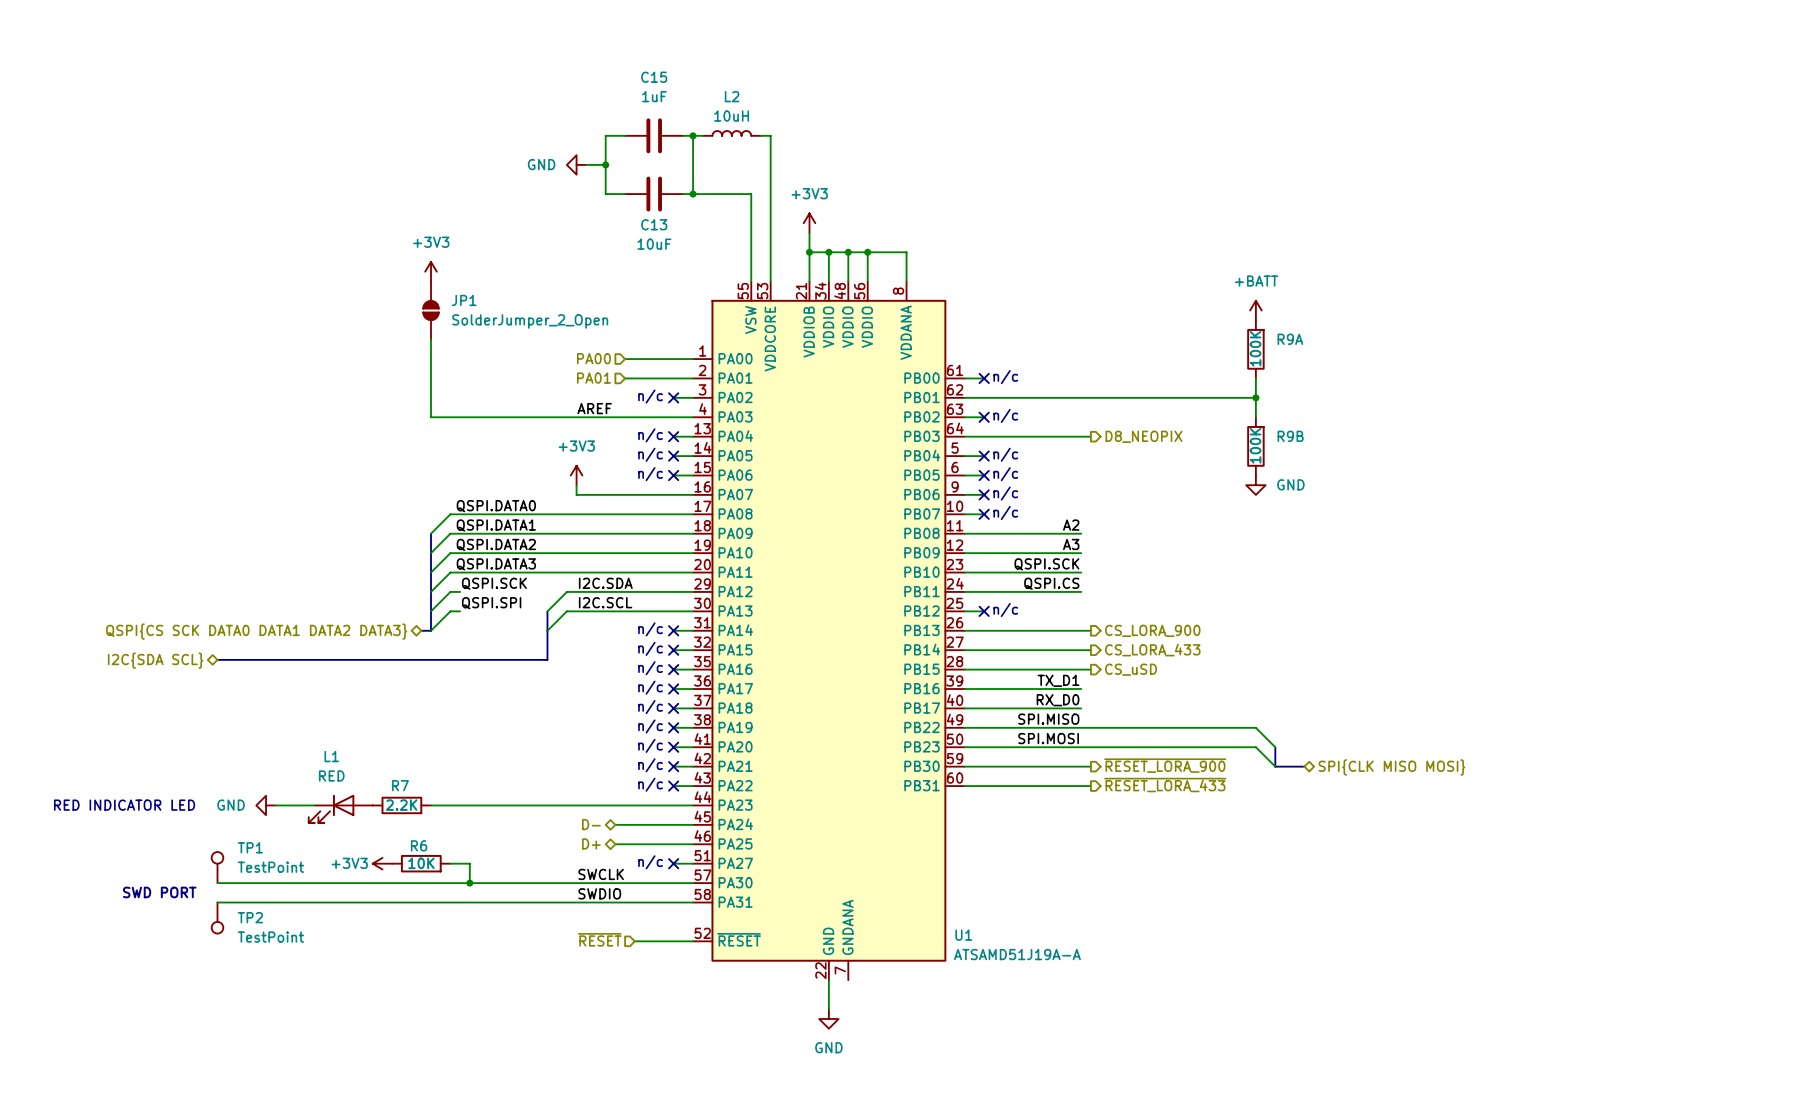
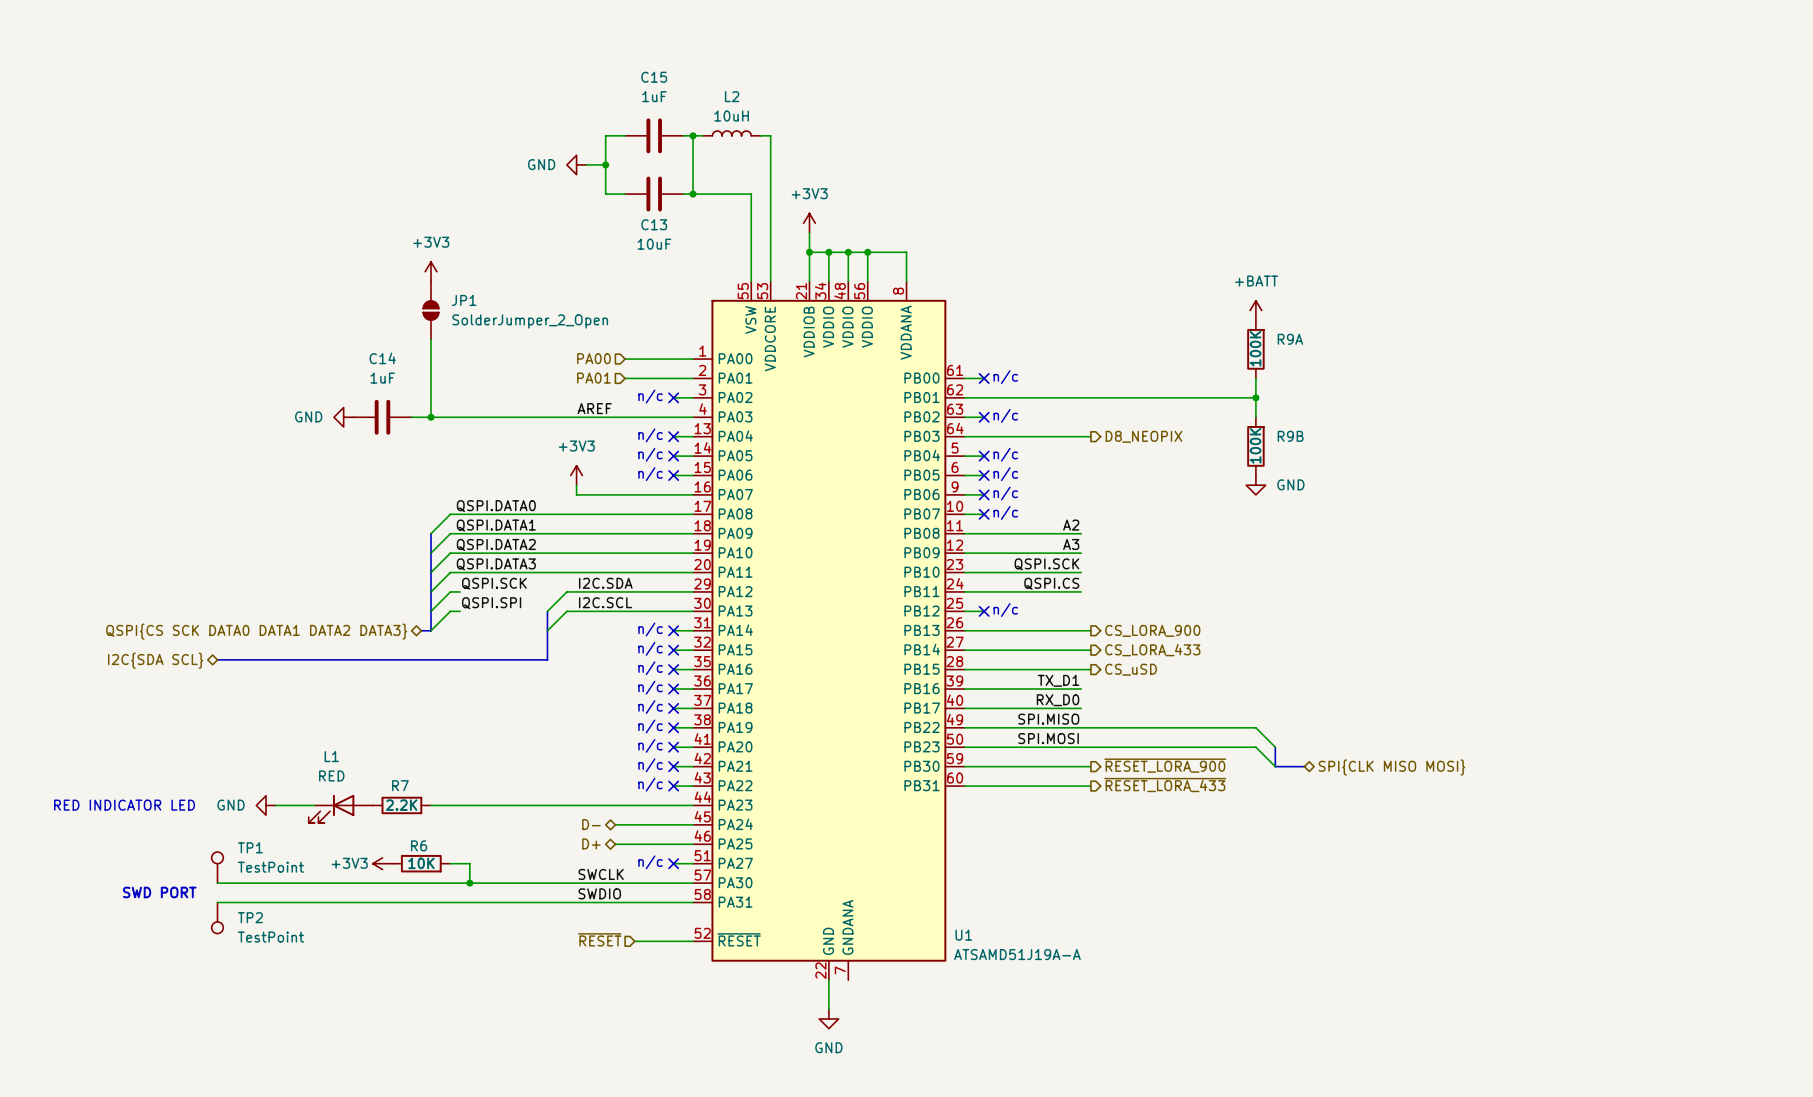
power symbol: none -> GND (343, 417)
C14: none -> 1uF (382, 417)
wire: none -> (411, 417) (431, 417)
junction: none -> (431, 417)

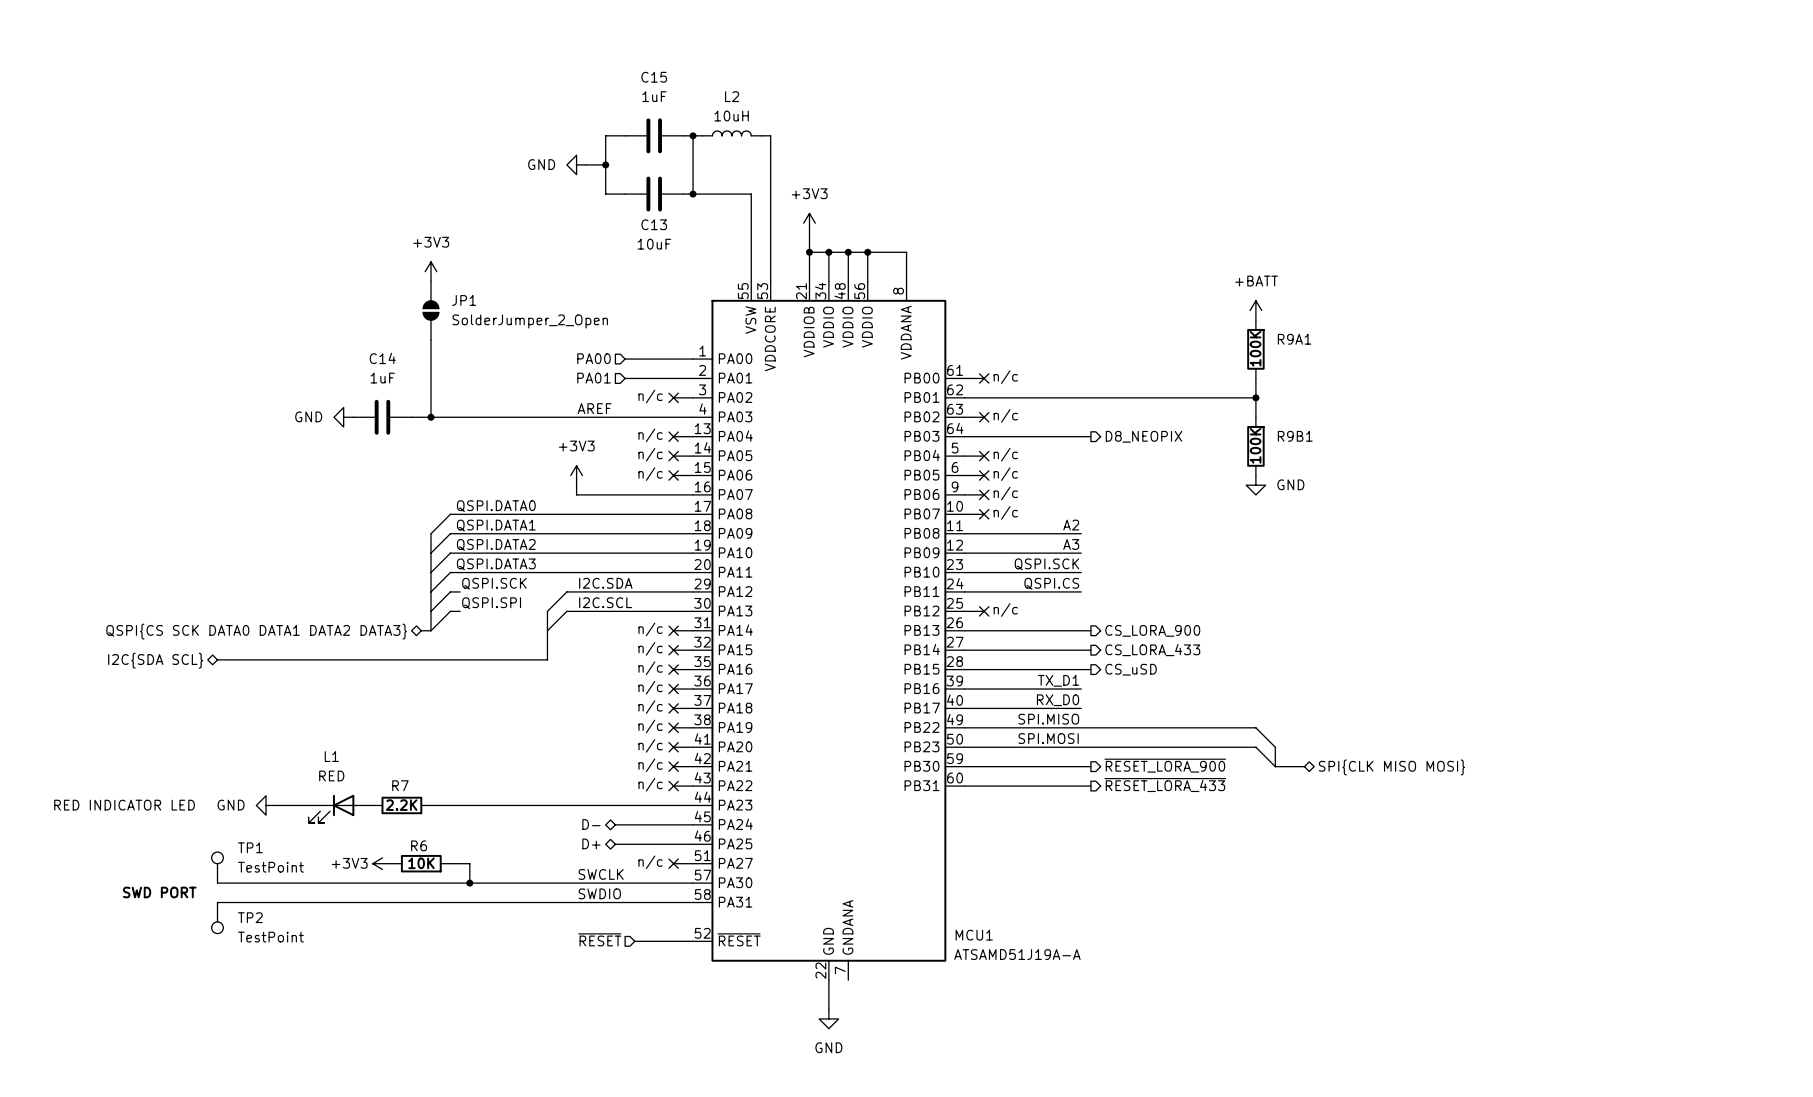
R9A name: R9A (1290, 339) -> R9A1 (1294, 339)
R9B name: R9B (1290, 436) -> R9B1 (1295, 436)
U1 name: U1 (963, 935) -> MCU1 (974, 935)

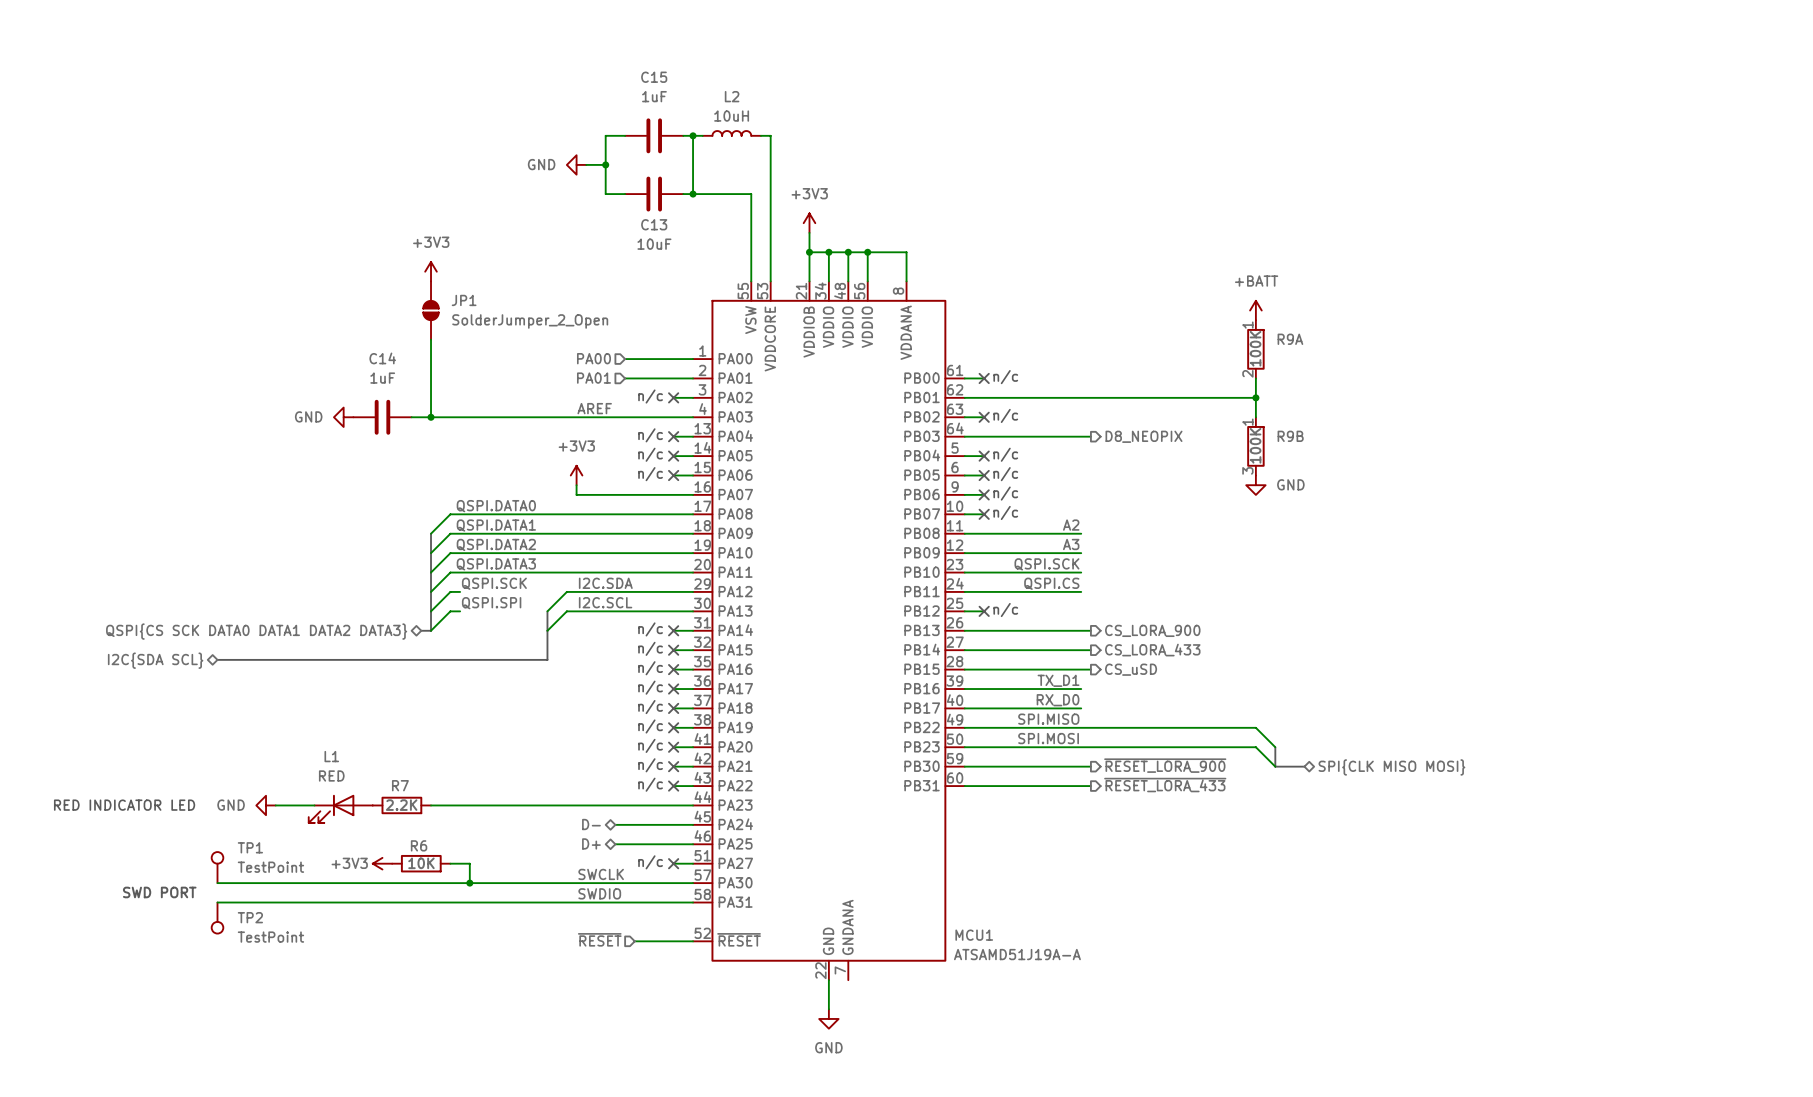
R9A1 pin number: none -> 1 (1247, 325)
R9A1 name: R9A1 (1294, 339) -> R9A (1290, 339)
R9A1 pin number: none -> 2 (1247, 373)
R9B1 pin number: none -> 1 (1247, 422)
R9B1 name: R9B1 (1295, 436) -> R9B (1290, 436)
R9B1 pin number: none -> 3 (1247, 470)

